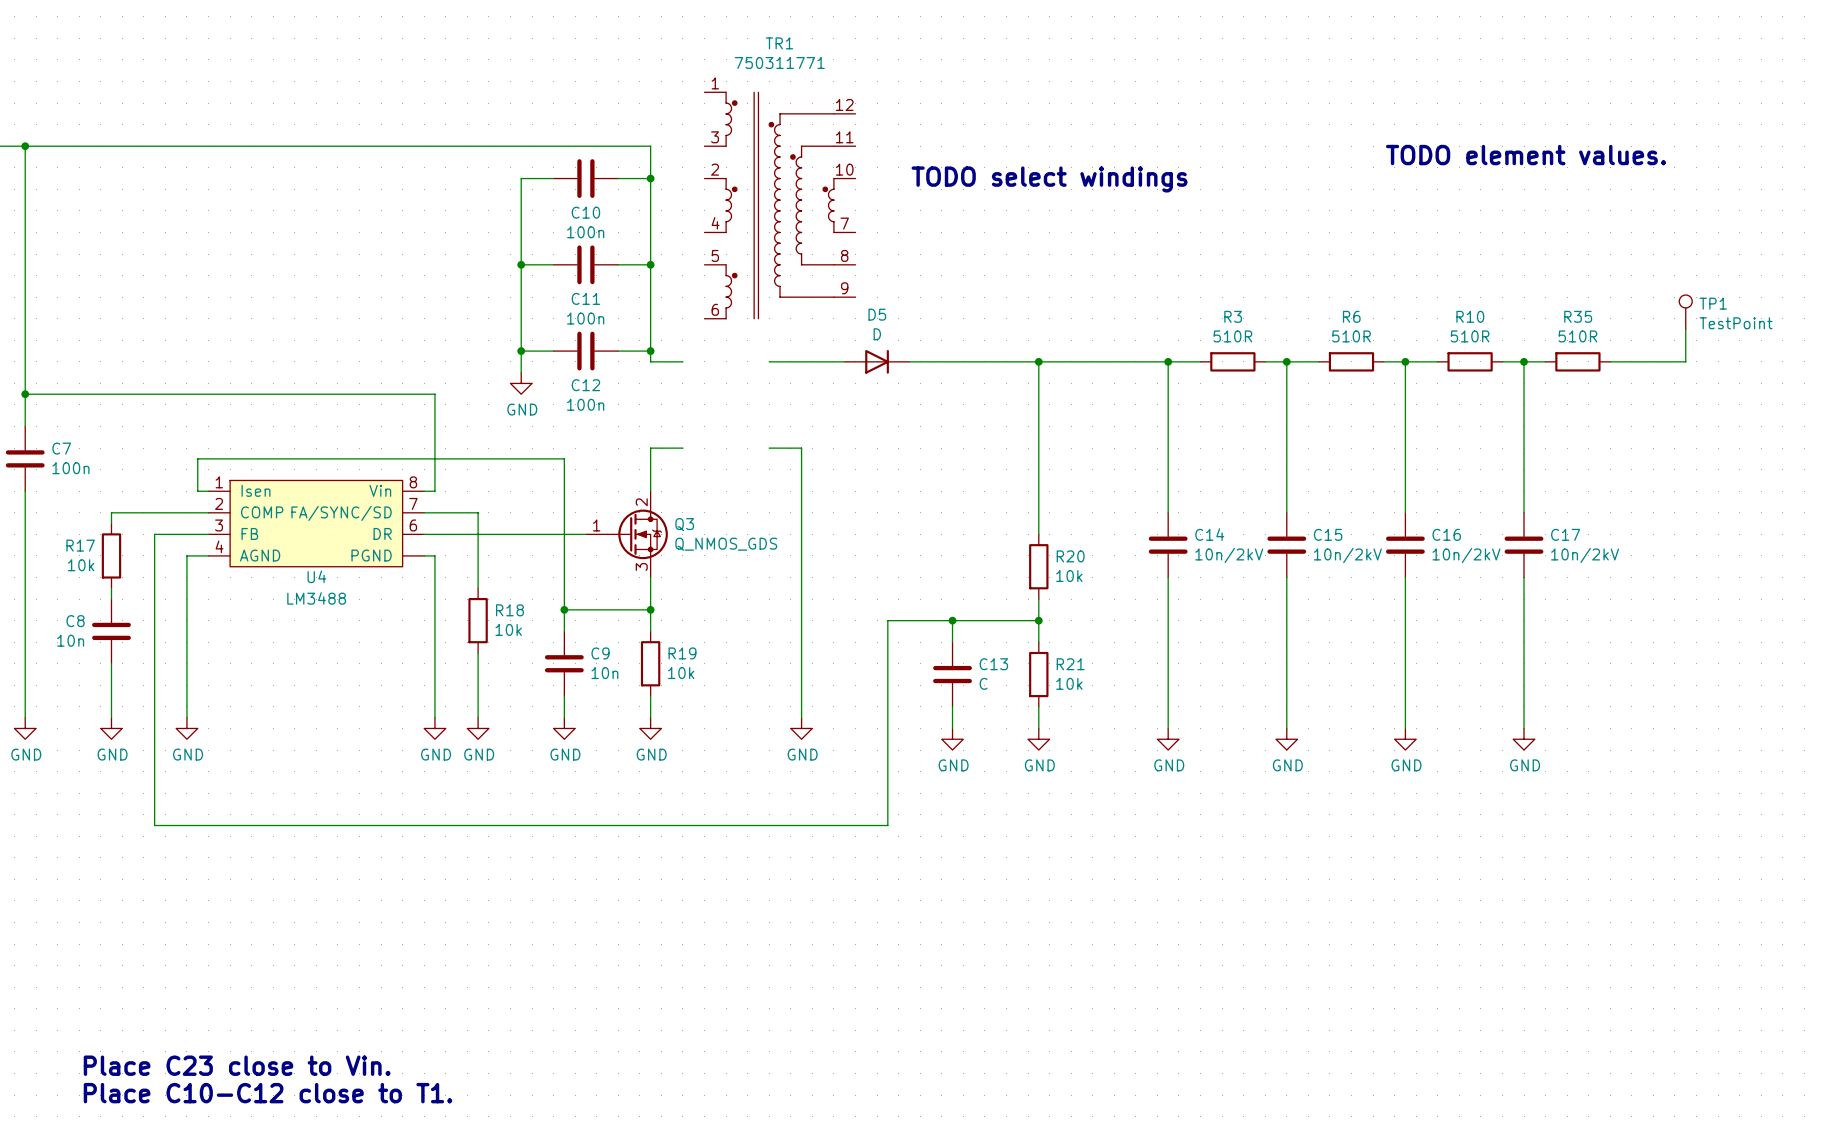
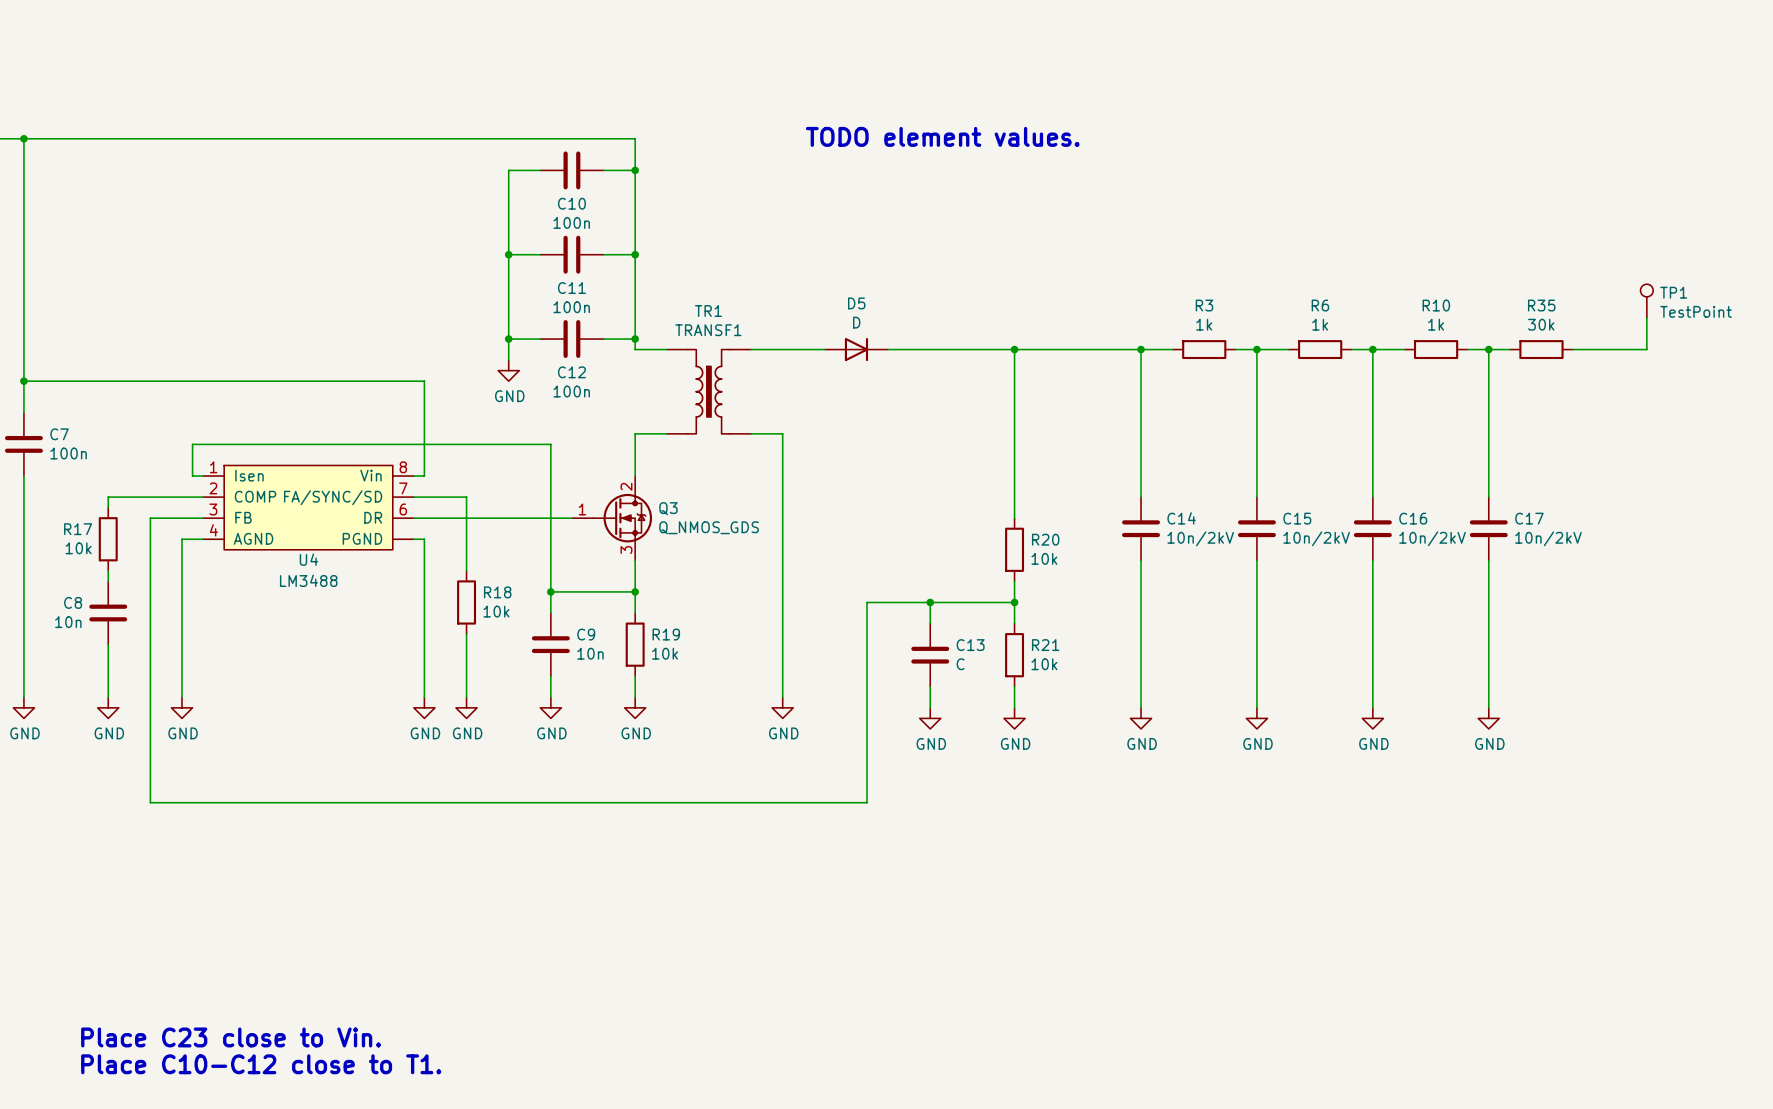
TR1 name position: TR1 (779, 43) -> TR1 (708, 311)
TR1 value: 750311771 (779, 62) -> TRANSF1 (708, 330)
TR1 symbol: [704, 92, 856, 319] -> [666, 348, 752, 435]
text: none -> TODO element values. (942, 136)
text: TODO element values. (1526, 155) -> none
text: TODO select windings (1049, 179) -> none
R3 value: 510R (1232, 336) -> 1k (1204, 324)
R6 value: 510R (1351, 336) -> 1k (1320, 324)
R10 value: 510R (1470, 336) -> 1k (1436, 324)
R35 value: 510R (1577, 336) -> 30k (1541, 324)

